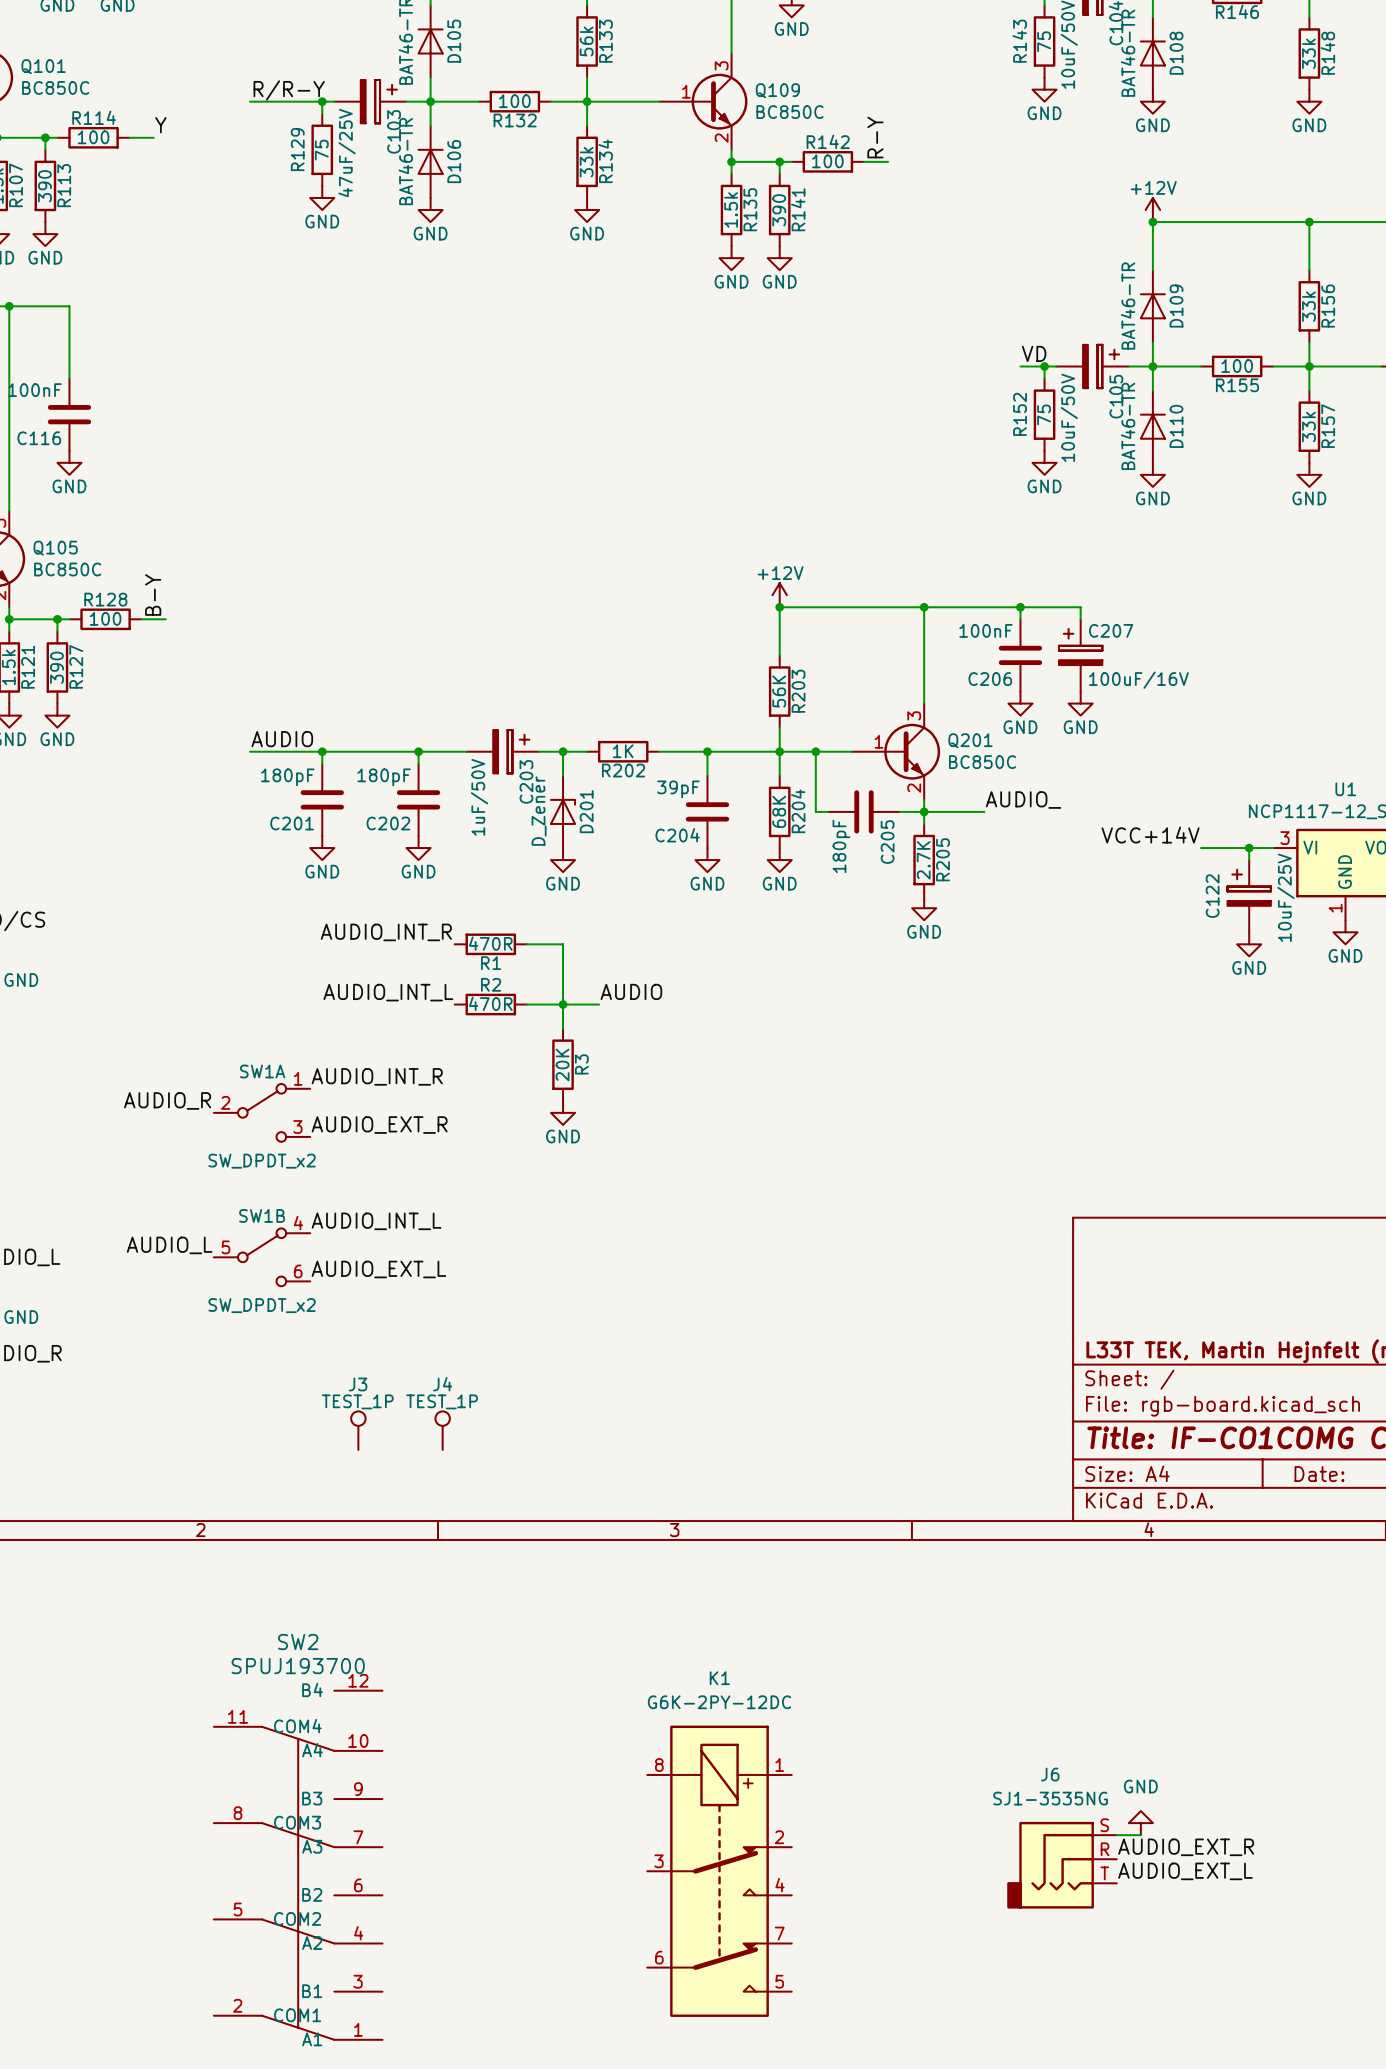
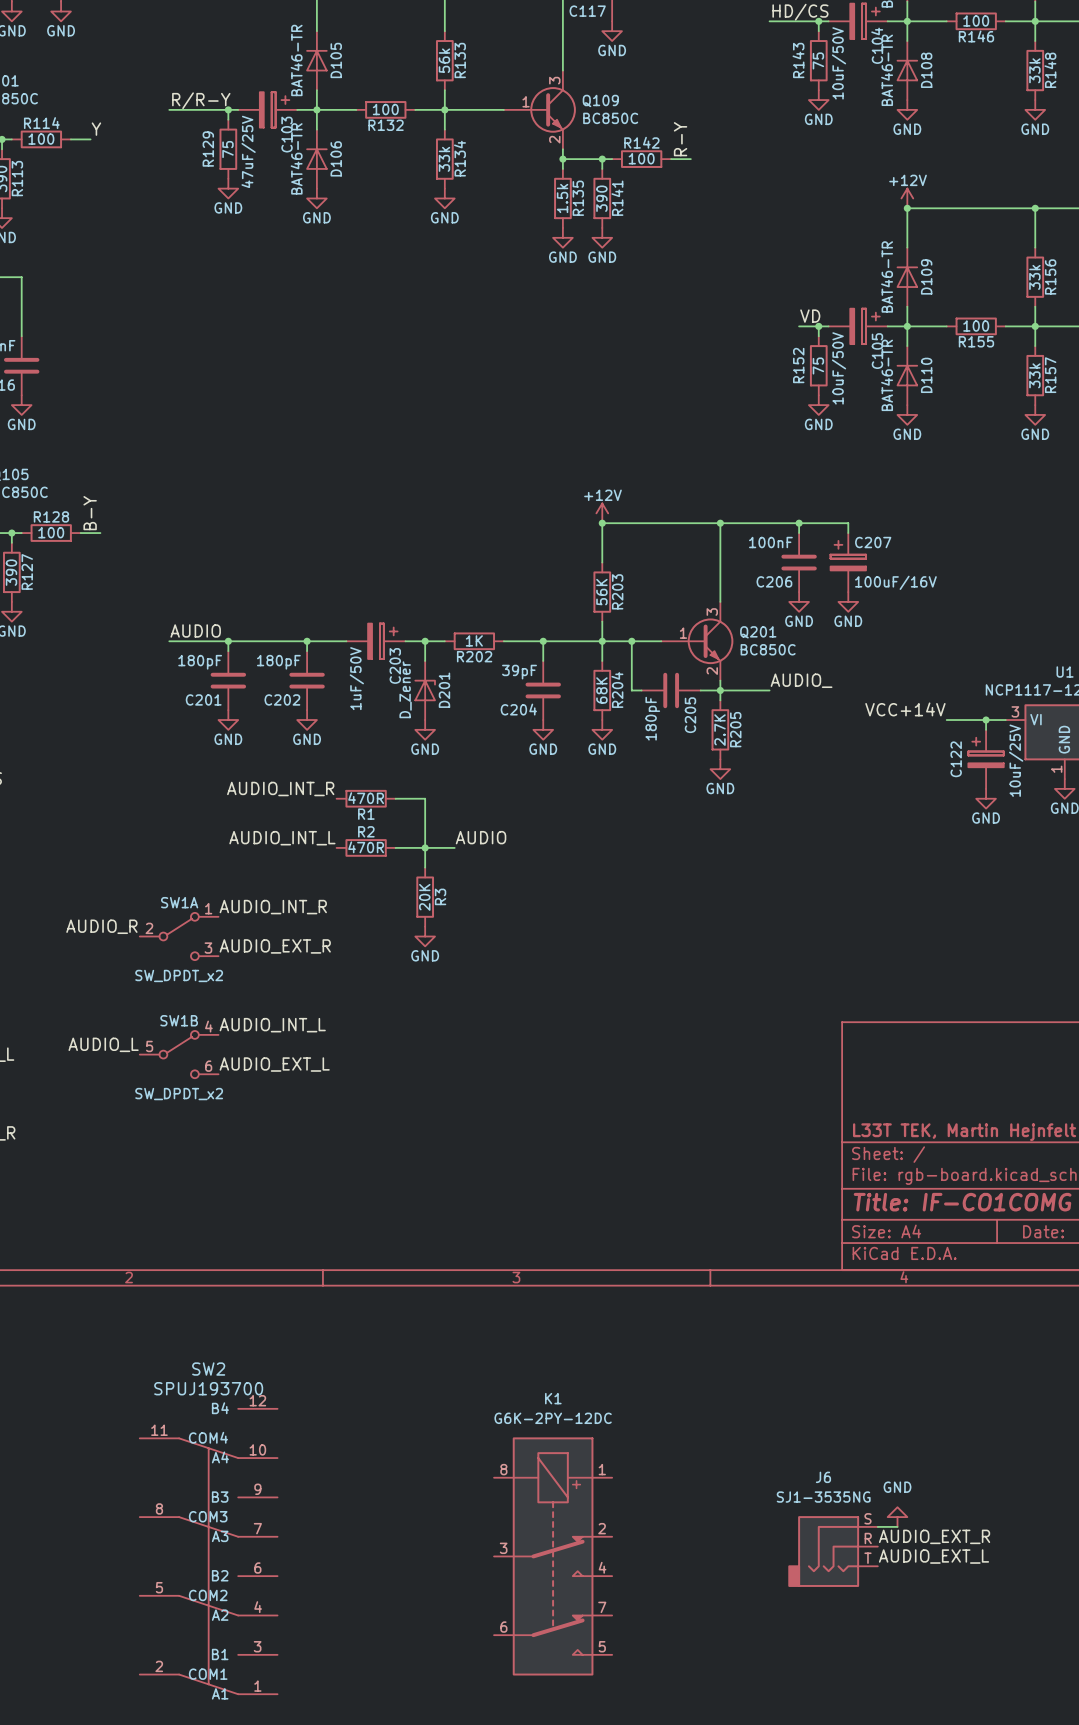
J3: TEST_1P (358, 1430) -> none
J4: TEST_1P (442, 1430) -> none

